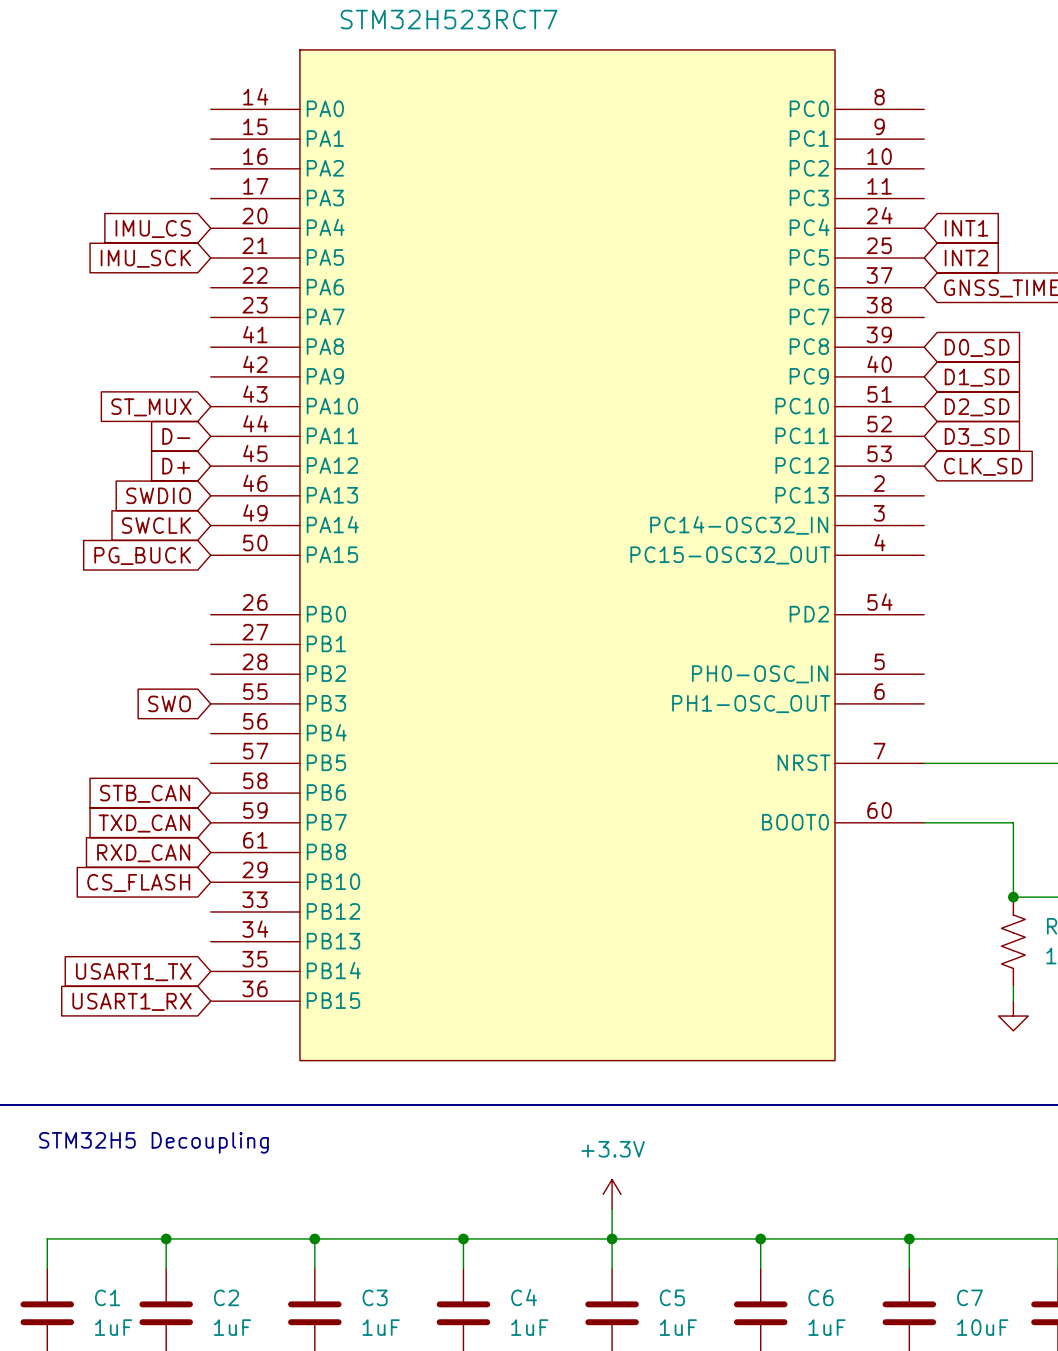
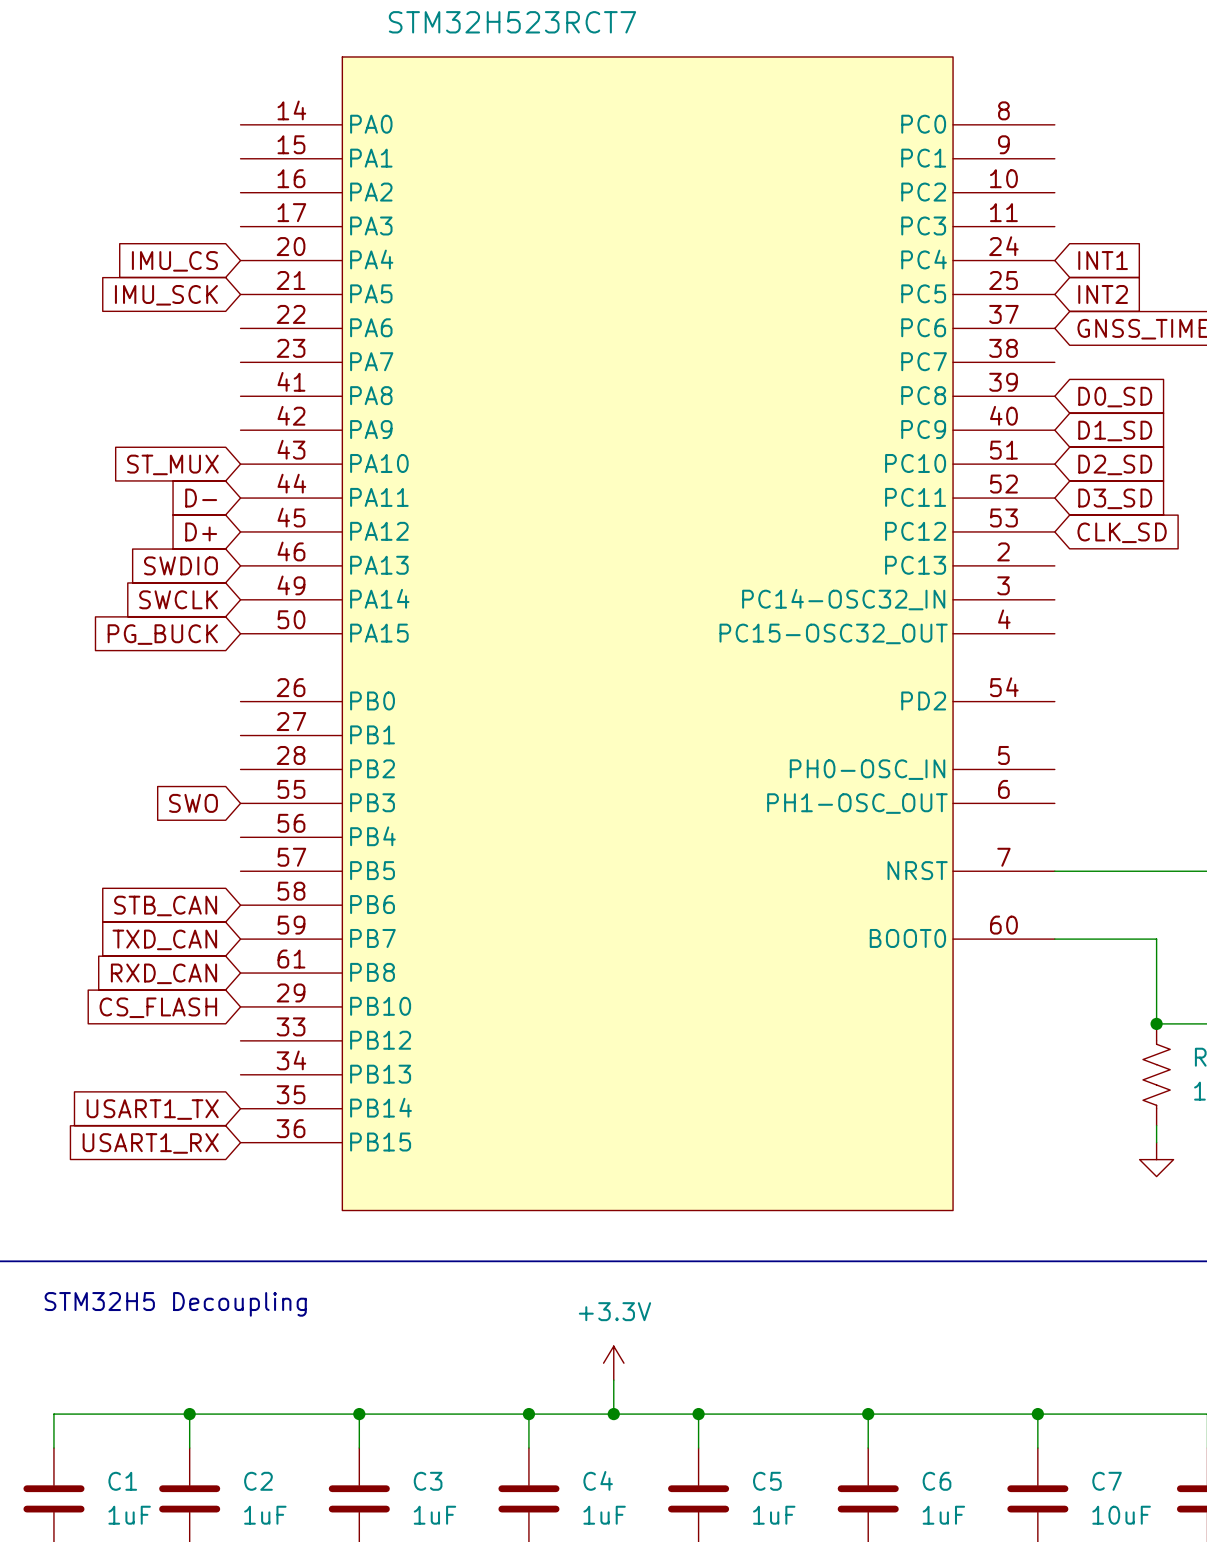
power symbol position: +3.3V (612, 1194) -> +3.3V (613, 1363)
wire: (612, 1209) (612, 1238) -> (613, 1380) (613, 1414)
junction: none -> (613, 1414)

